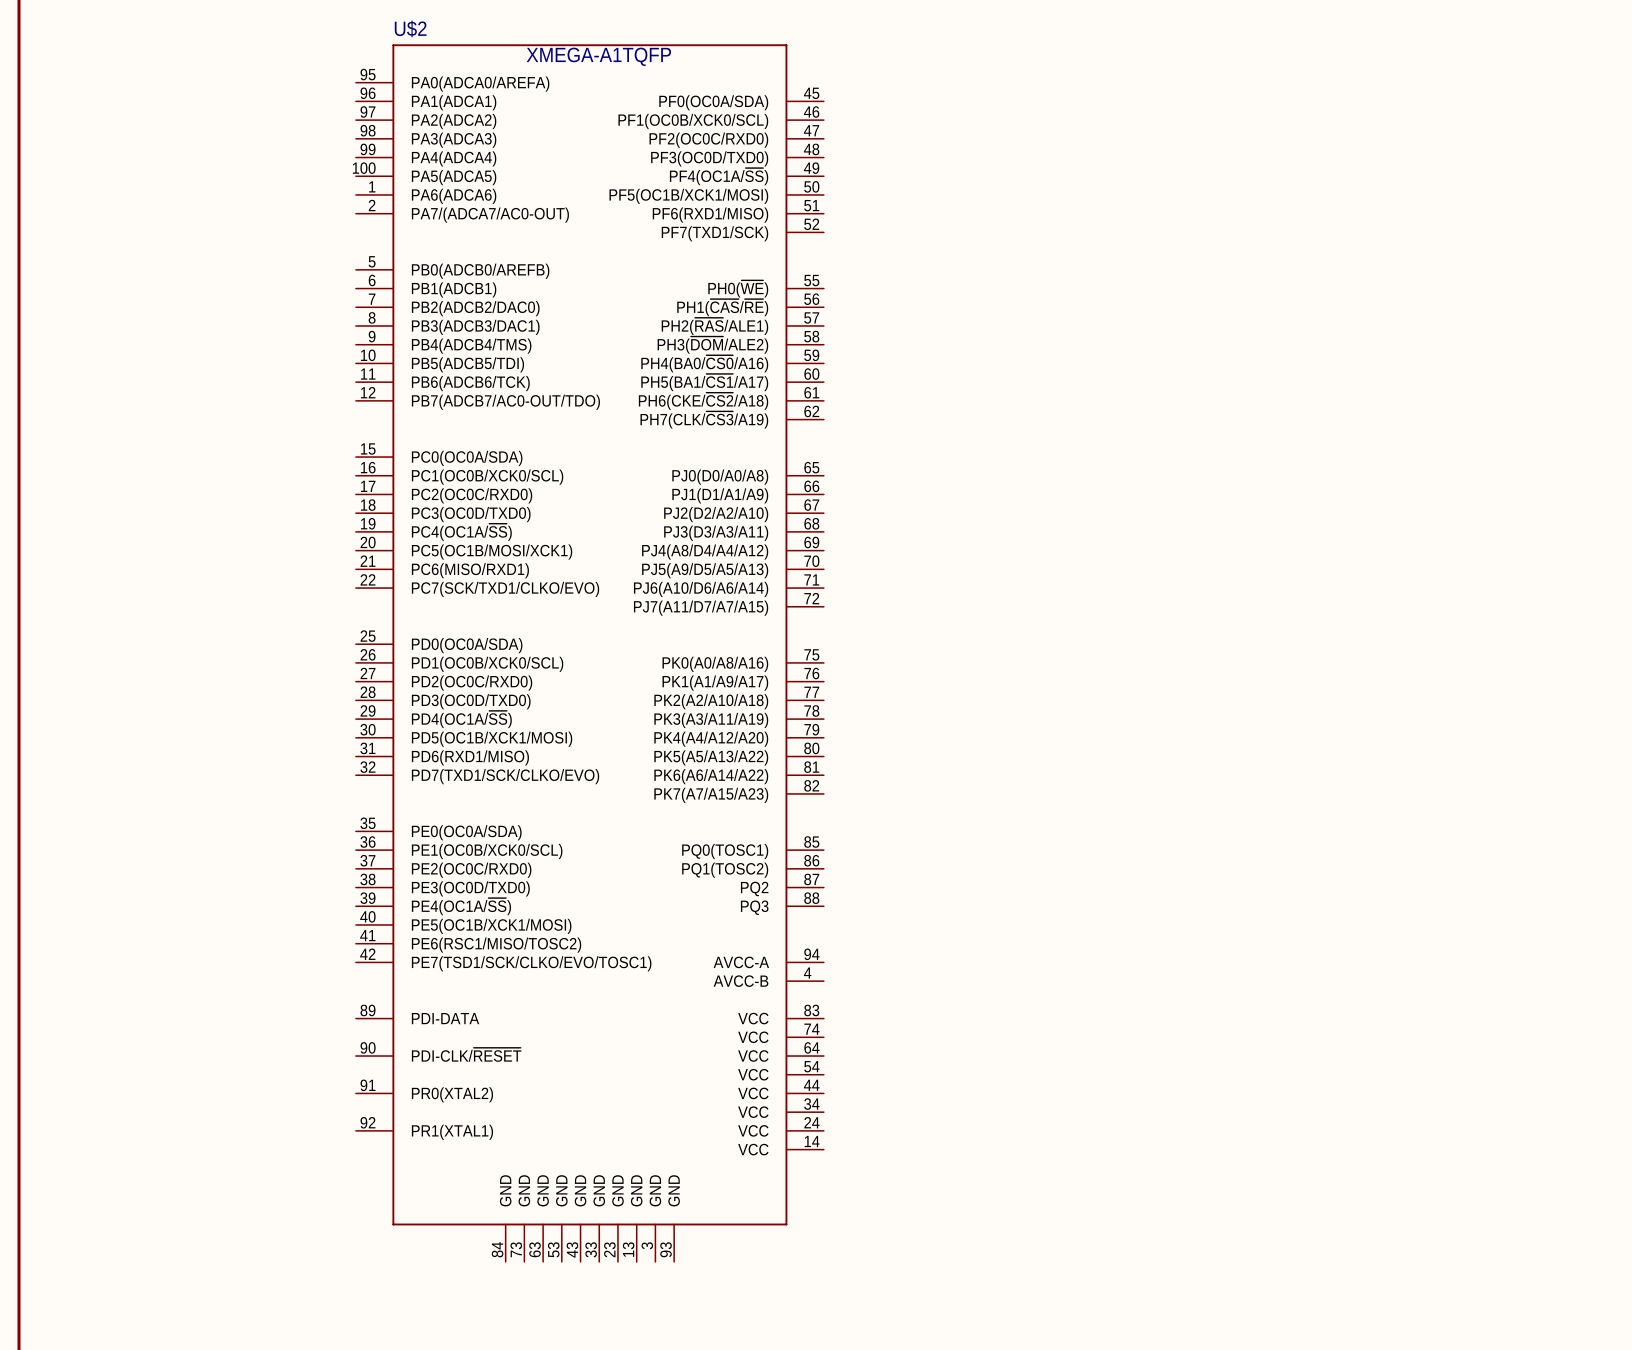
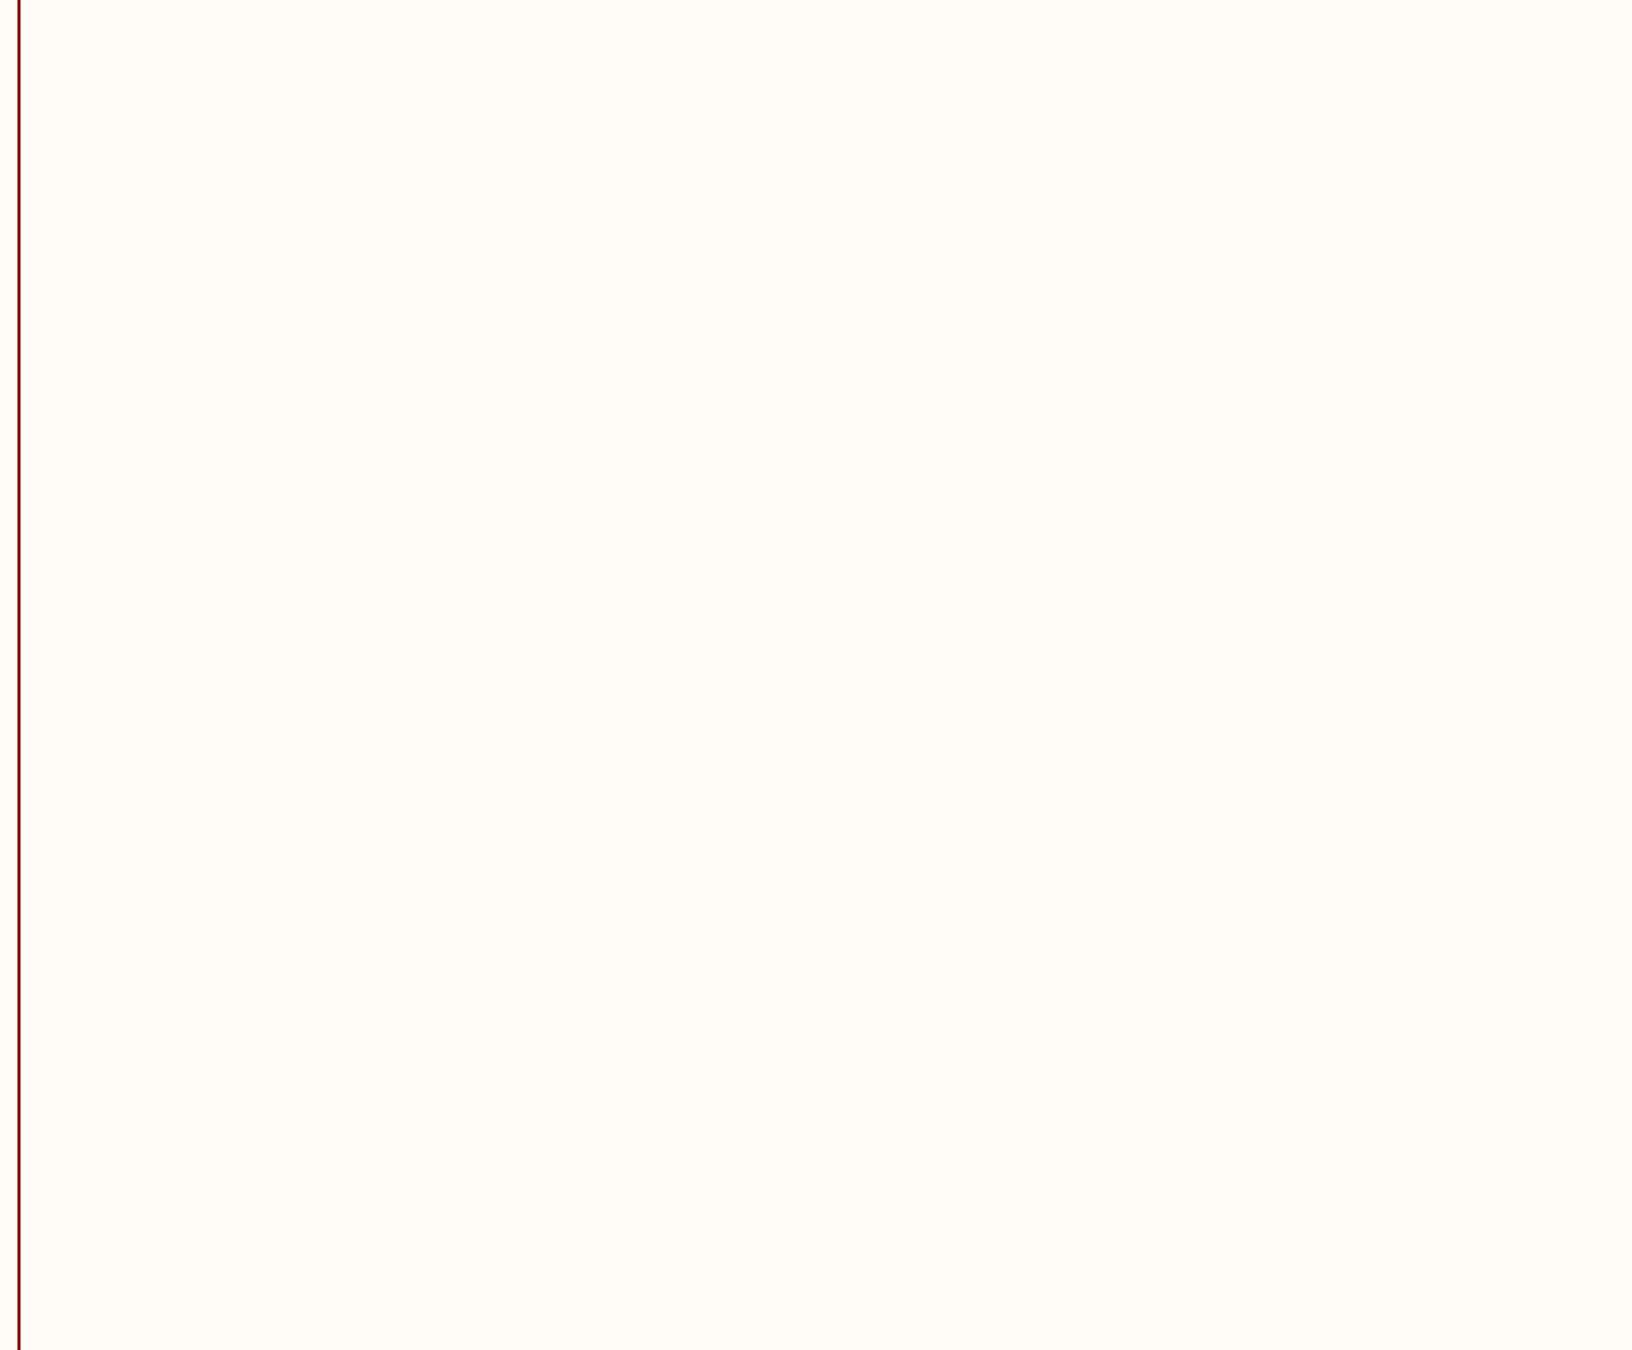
U$2: XMEGA-A1TQFP (589, 653) -> none

